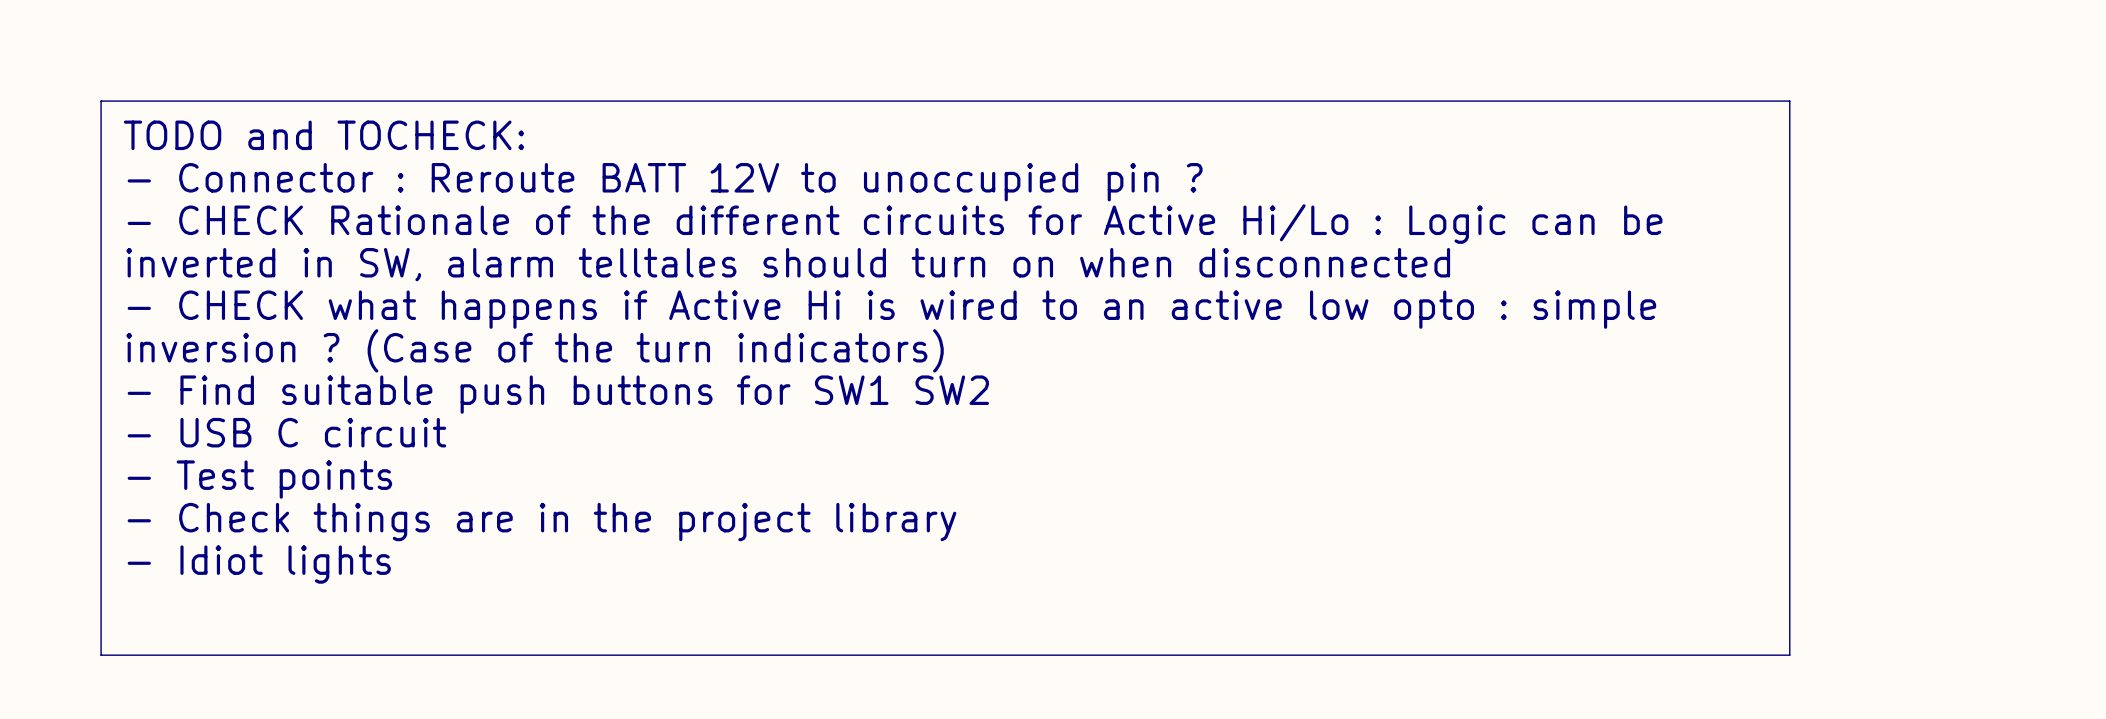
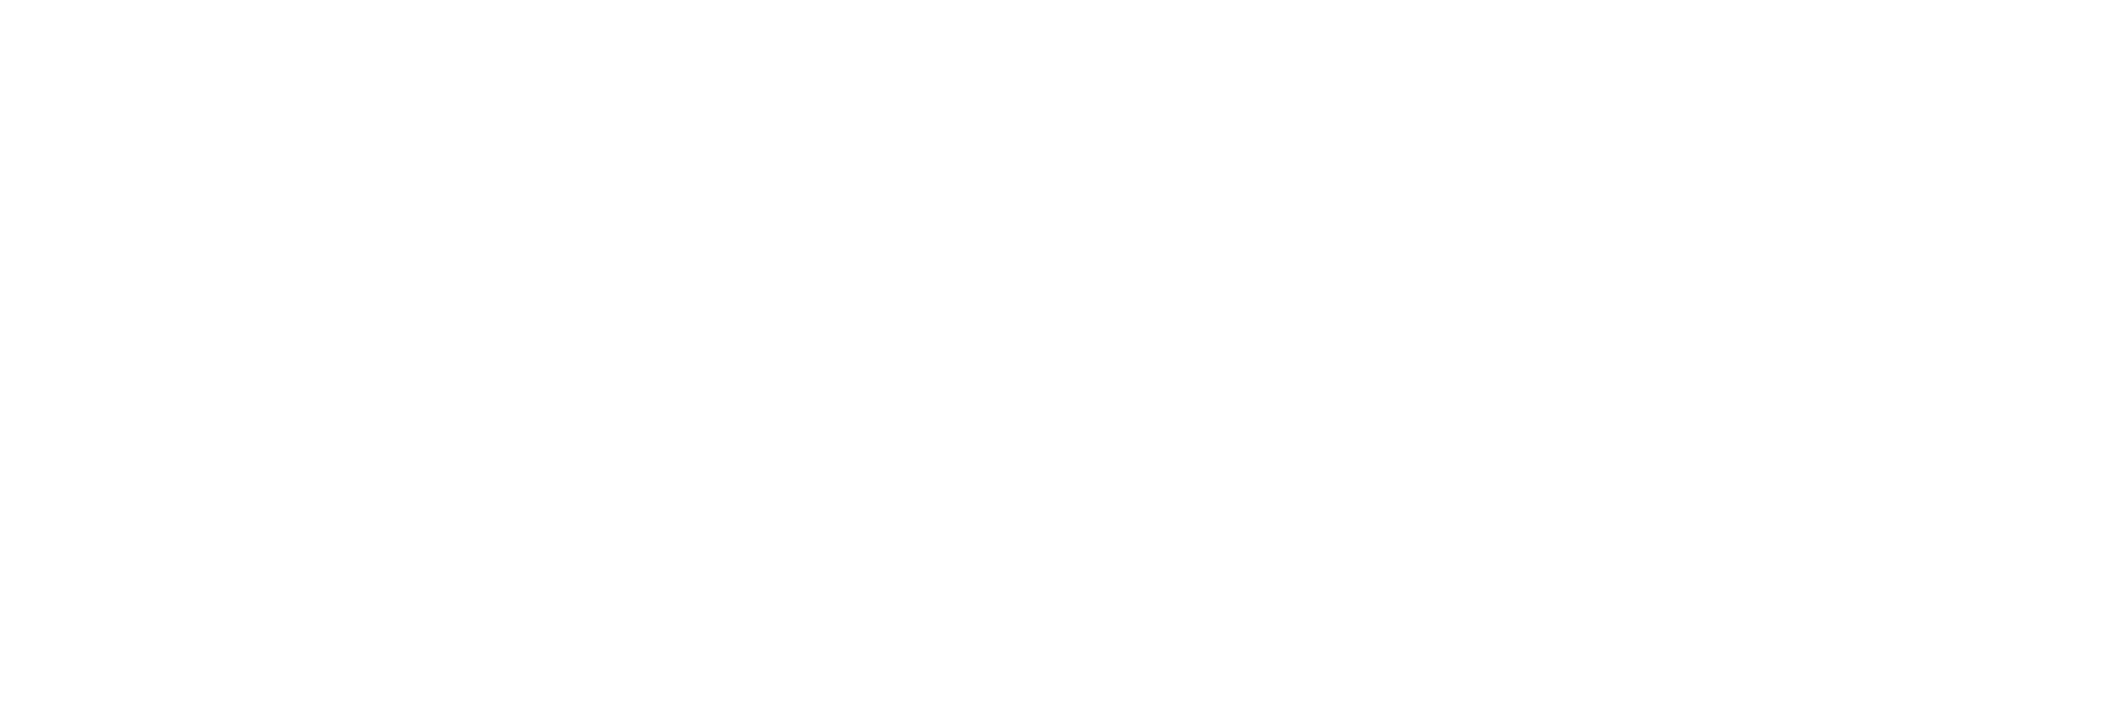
line: (101, 101) (1789, 101) (1789, 655) (101, 655) (101, 101) -> none
text: TODO and TOCHECK: (323, 135) -> none
text: - Connector : Reroute BATT 12V to unoccupied pin ? (665, 182) -> none
text: - CHECK Rationale of the different circuits for Active Hi/Lo : Logic can be (895, 224) -> none
text: inverted in SW, alarm telltales should turn on when disconnected (788, 264) -> none
text: - CHECK what happens if Active Hi is wired to an active low opto : simple (891, 309) -> none
text: inversion ? (Case of the turn indicators) (535, 350) -> none
text: - Find suitable push buttons for SW1 SW2 (558, 394) -> none
text: - USB C circuit (286, 432) -> none
text: - Test points (259, 479) -> none
text: - Check things are in the project library (541, 522) -> none
text: - Idiot lights (259, 564) -> none

